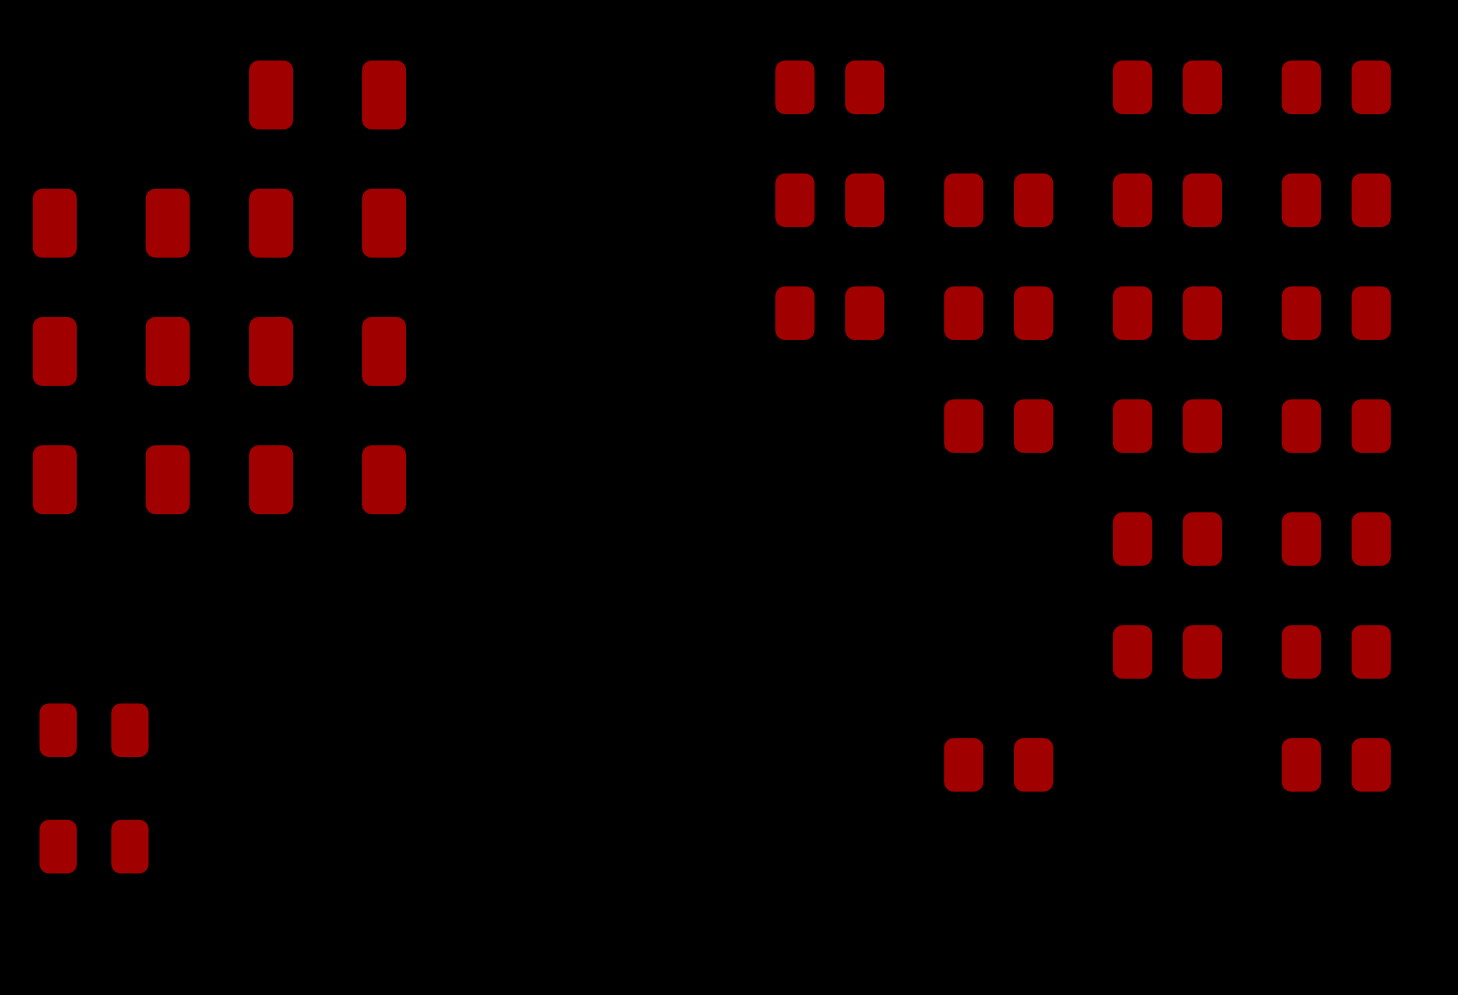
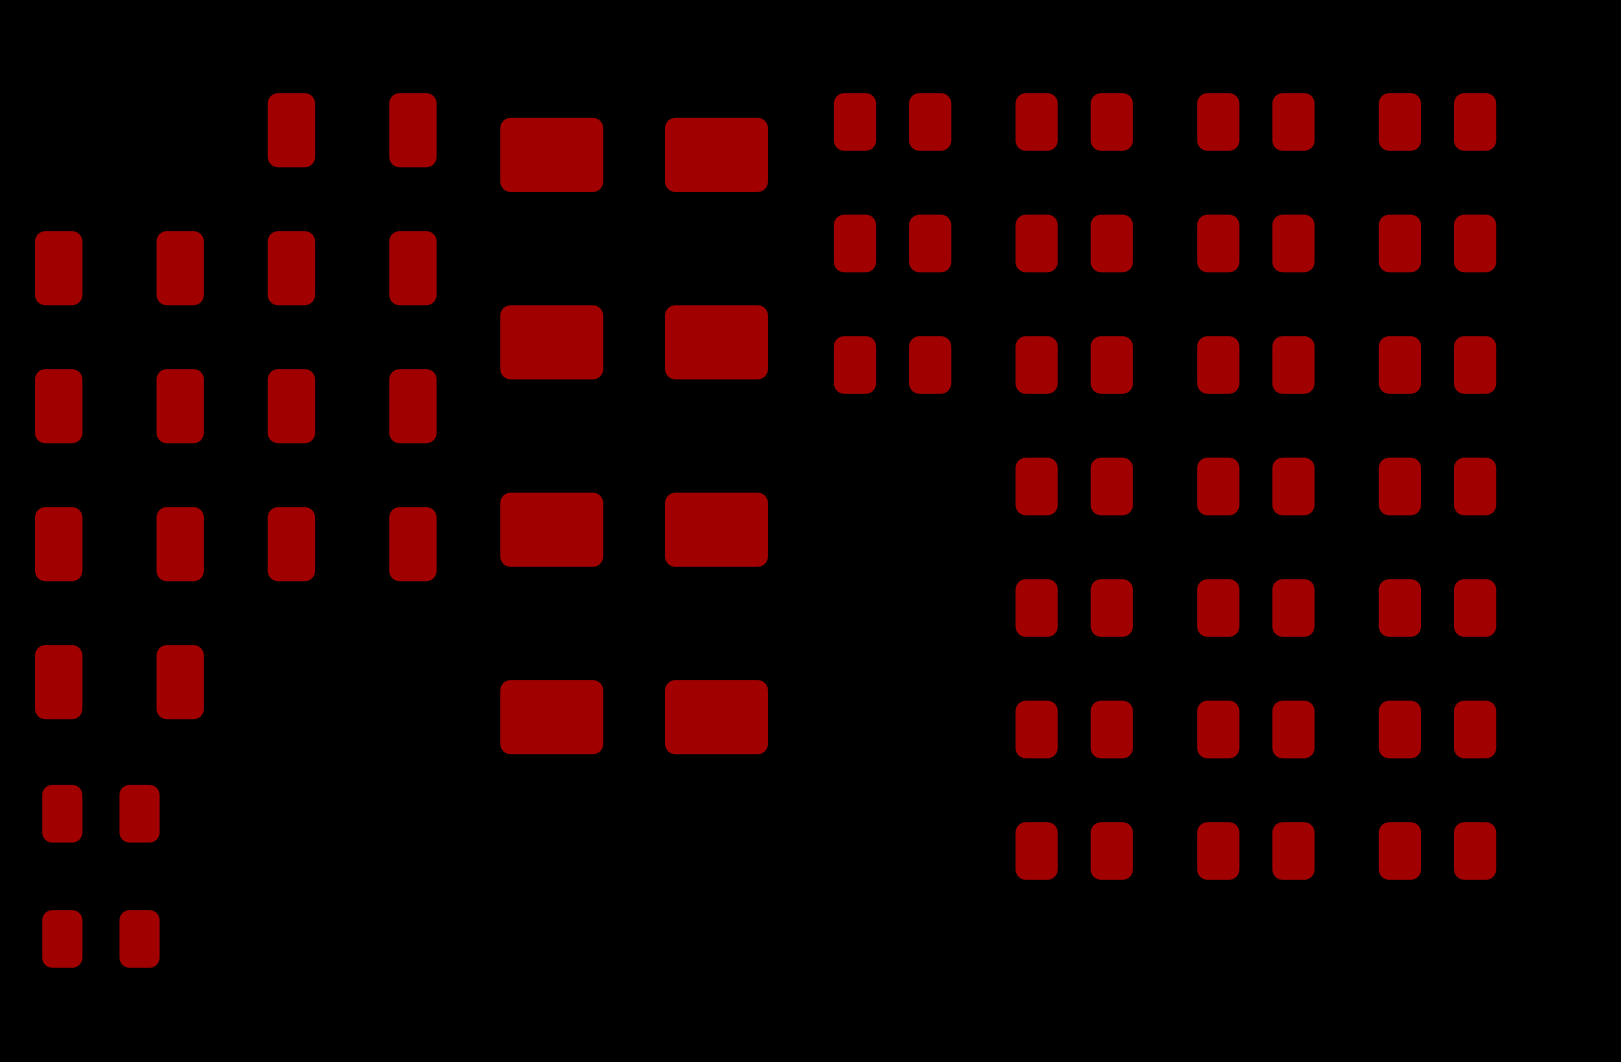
part: none -> (1074, 121)
part: none -> (634, 154)
part: none -> (634, 342)
part: none -> (634, 529)
part: none -> (1074, 607)
part: none -> (119, 682)
part: none -> (634, 717)
part: none -> (1074, 729)
part: none -> (1255, 851)

